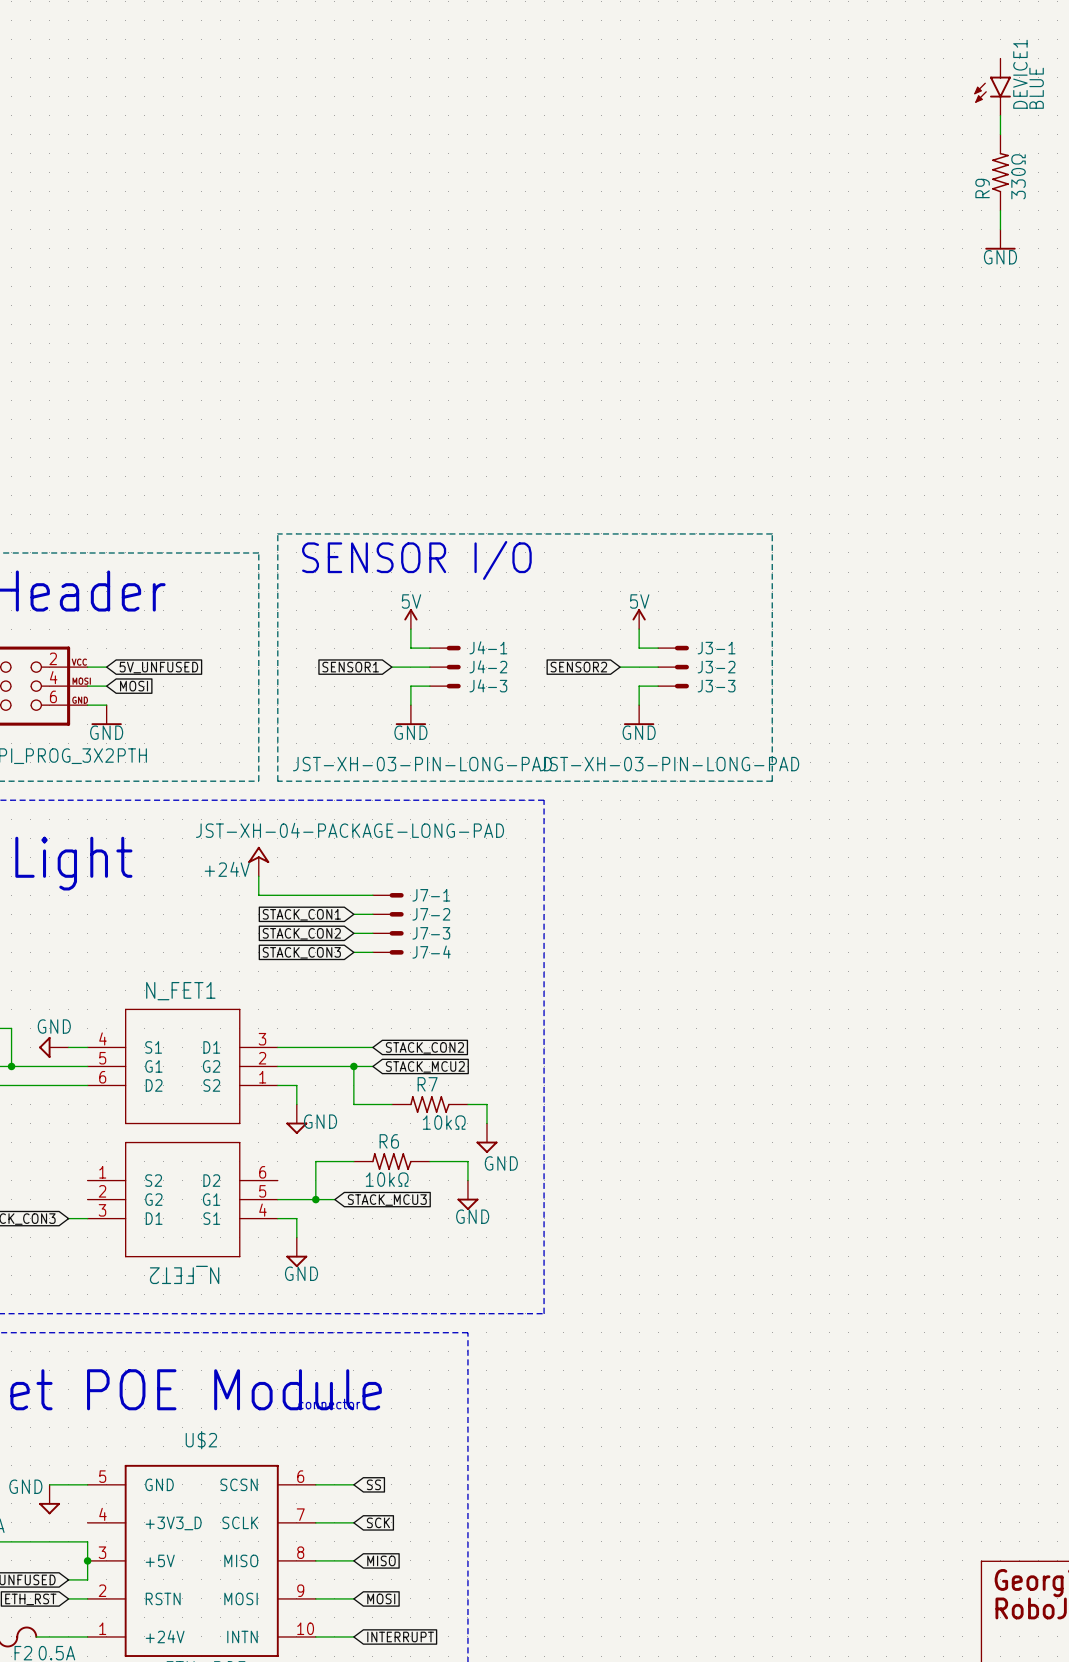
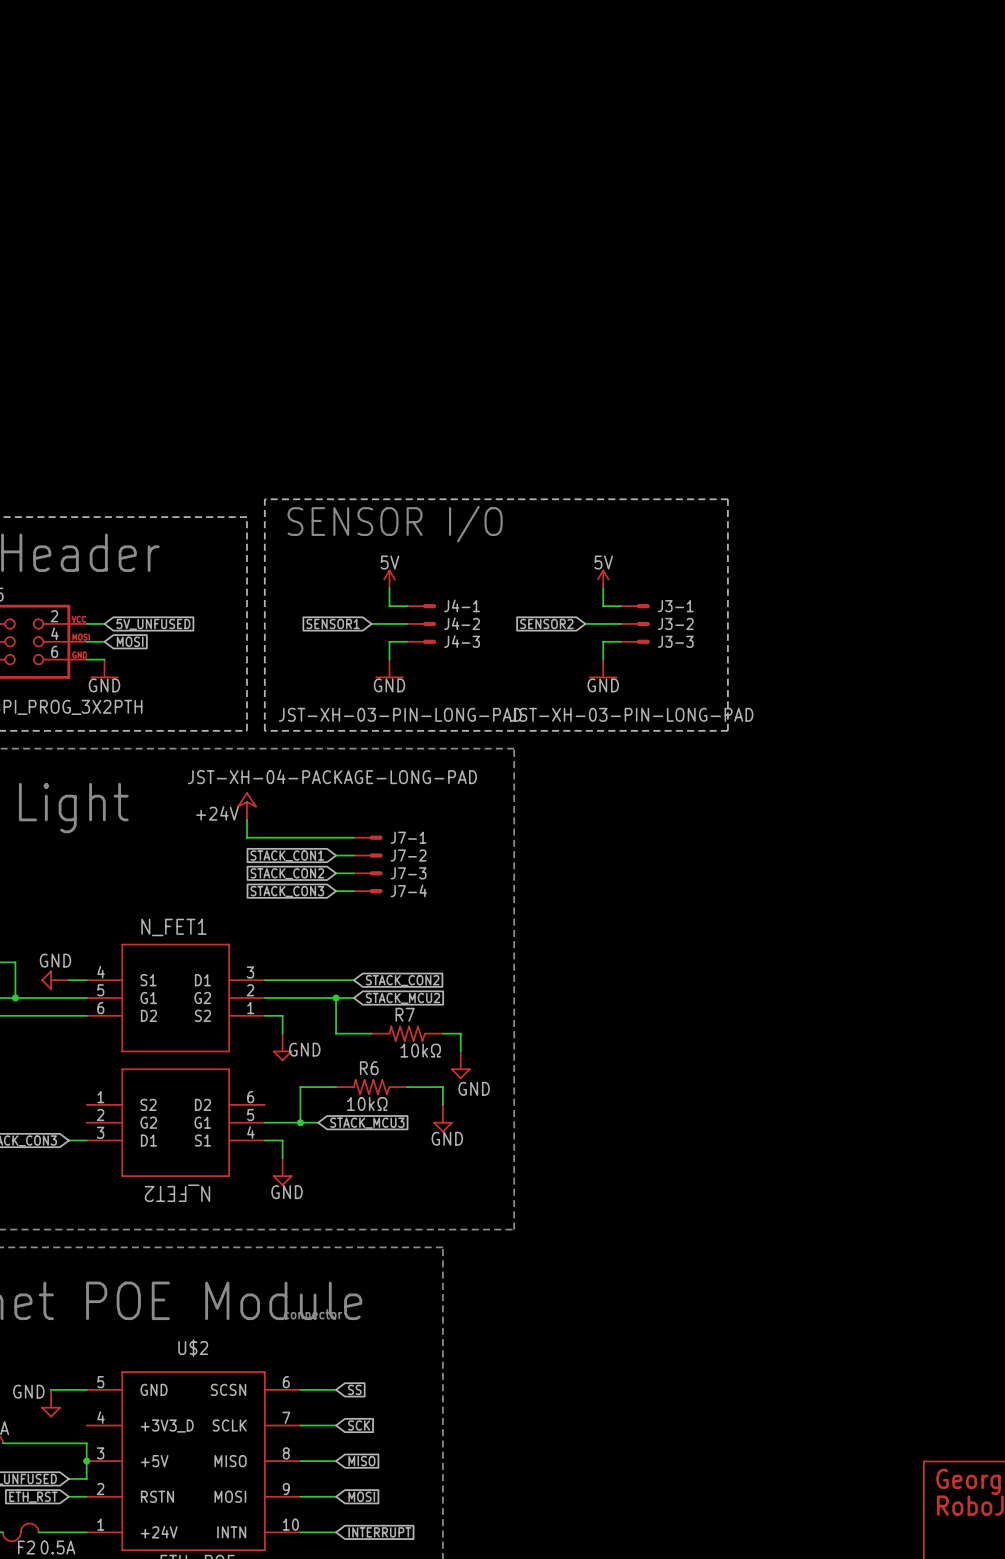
DEVICE1: BLUE (992, 87) -> none
wire: (1000, 115) (1000, 134) -> none
R9: 330Ω (1000, 172) -> none
wire: (1000, 210) (1000, 229) -> none
power symbol: GND (1000, 239) -> none

